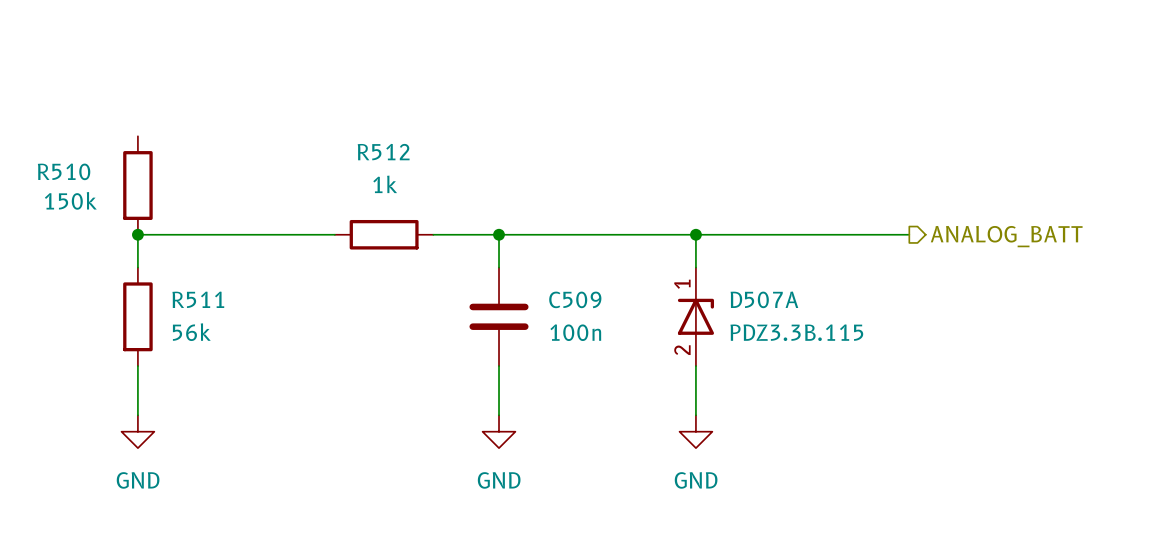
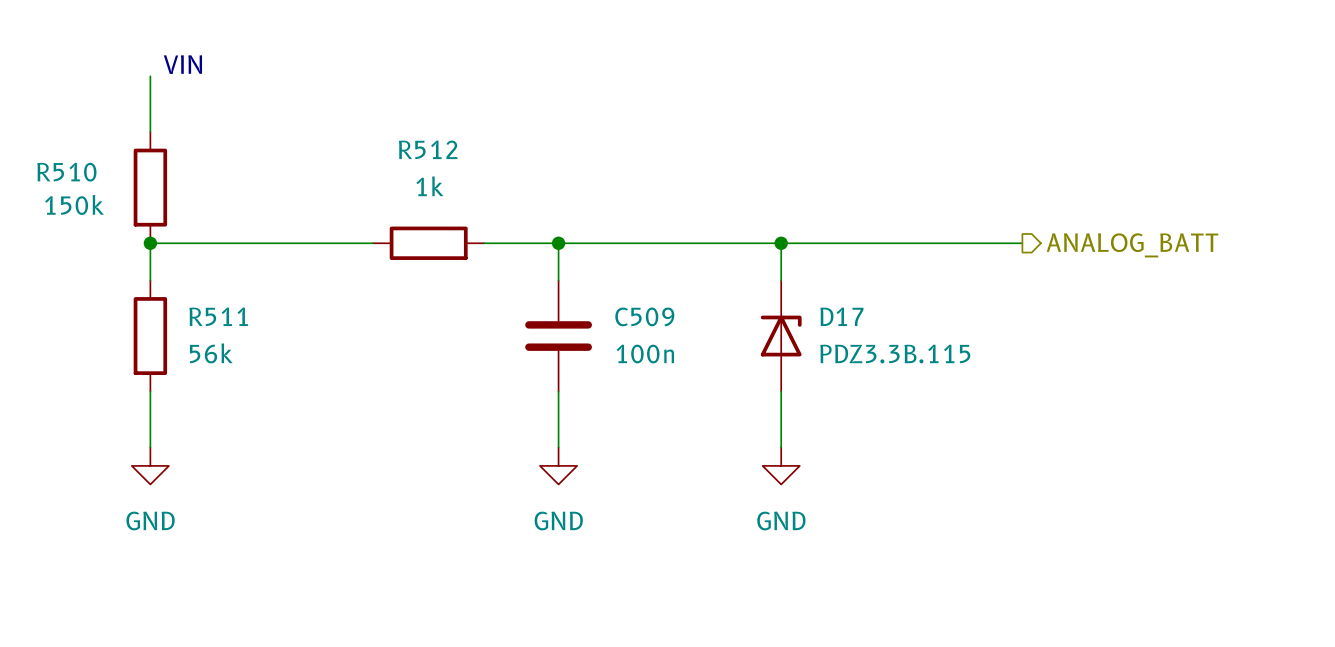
text: none -> VIN (182, 64)
wire: none -> (150, 76) (150, 131)
D507A: PDZ3.3B.115 (695, 316) -> none
D17: none -> PDZ3.3B.115 (781, 336)

